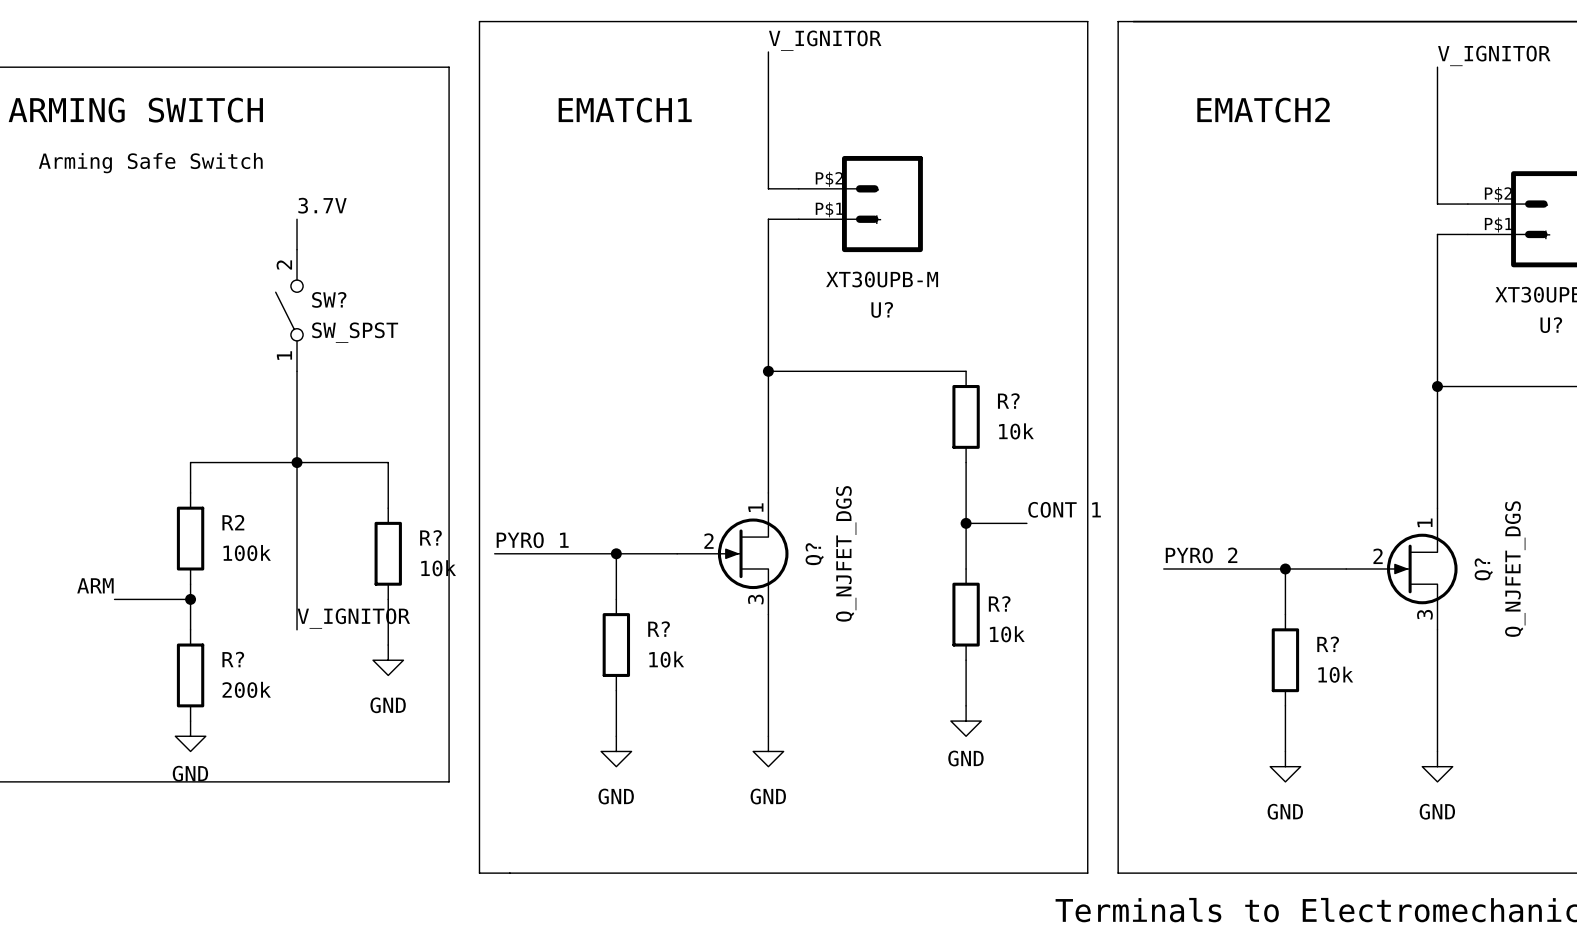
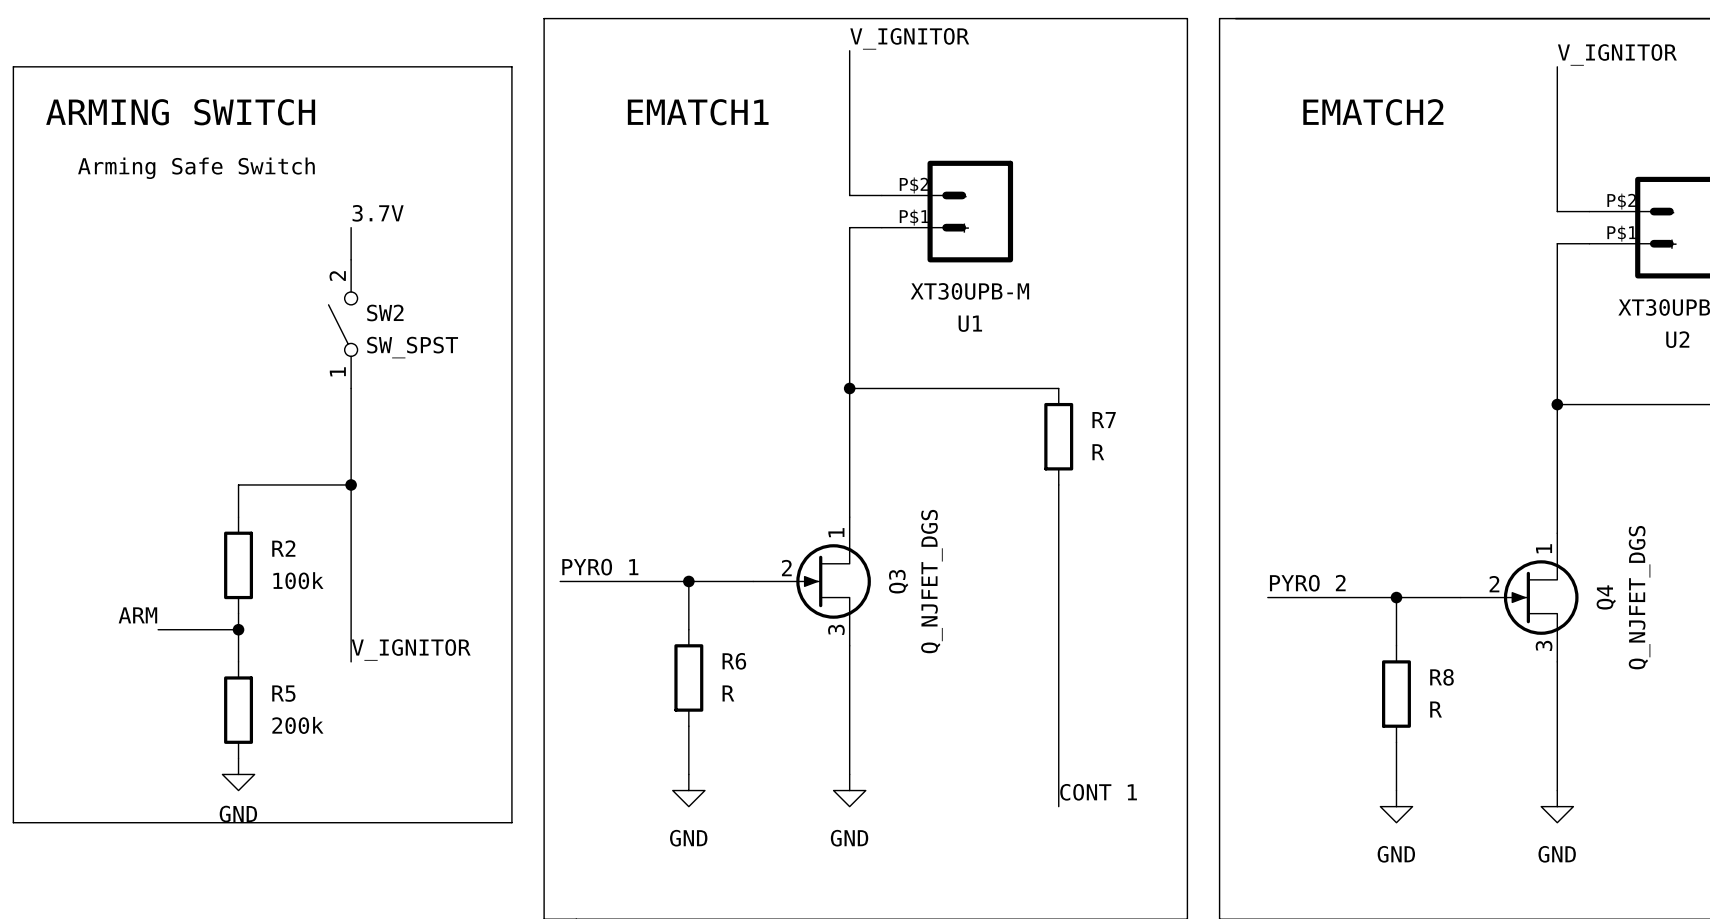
SW? name: SW? (329, 299) -> SW2 (385, 312)
U? name: U? (882, 309) -> U1 (970, 323)
U? name: U? (1551, 325) -> U2 (1677, 339)
R? name: R? (1008, 401) -> R7 (1104, 420)
R? value: 10k (1016, 431) -> R (1098, 452)
wire: (297, 462) (388, 462) (388, 508) -> none
label position: CONT 1 (1064, 509) -> CONT 1 (1098, 792)
wire: (966, 523) (1026, 523) -> none
junction: (966, 523) -> none
R?: 10k (388, 553) -> none
Q? name: Q? (814, 554) -> Q3 (898, 581)
wire: none -> (1058, 597) (1058, 694)
Q? name: Q? (1483, 569) -> Q4 (1606, 597)
wire: (388, 599) (388, 645) -> none
R?: 10k (966, 614) -> none
R? name: R? (659, 629) -> R6 (734, 661)
R? name: R? (1328, 644) -> R8 (1441, 677)
R? name: R? (233, 659) -> R5 (283, 693)
R? value: 10k (666, 659) -> R (728, 693)
power symbol: GND (388, 660) -> none
R? value: 10k (1335, 674) -> R (1436, 709)
wire: none -> (1058, 742) (1058, 806)
power symbol: GND (966, 721) -> none

